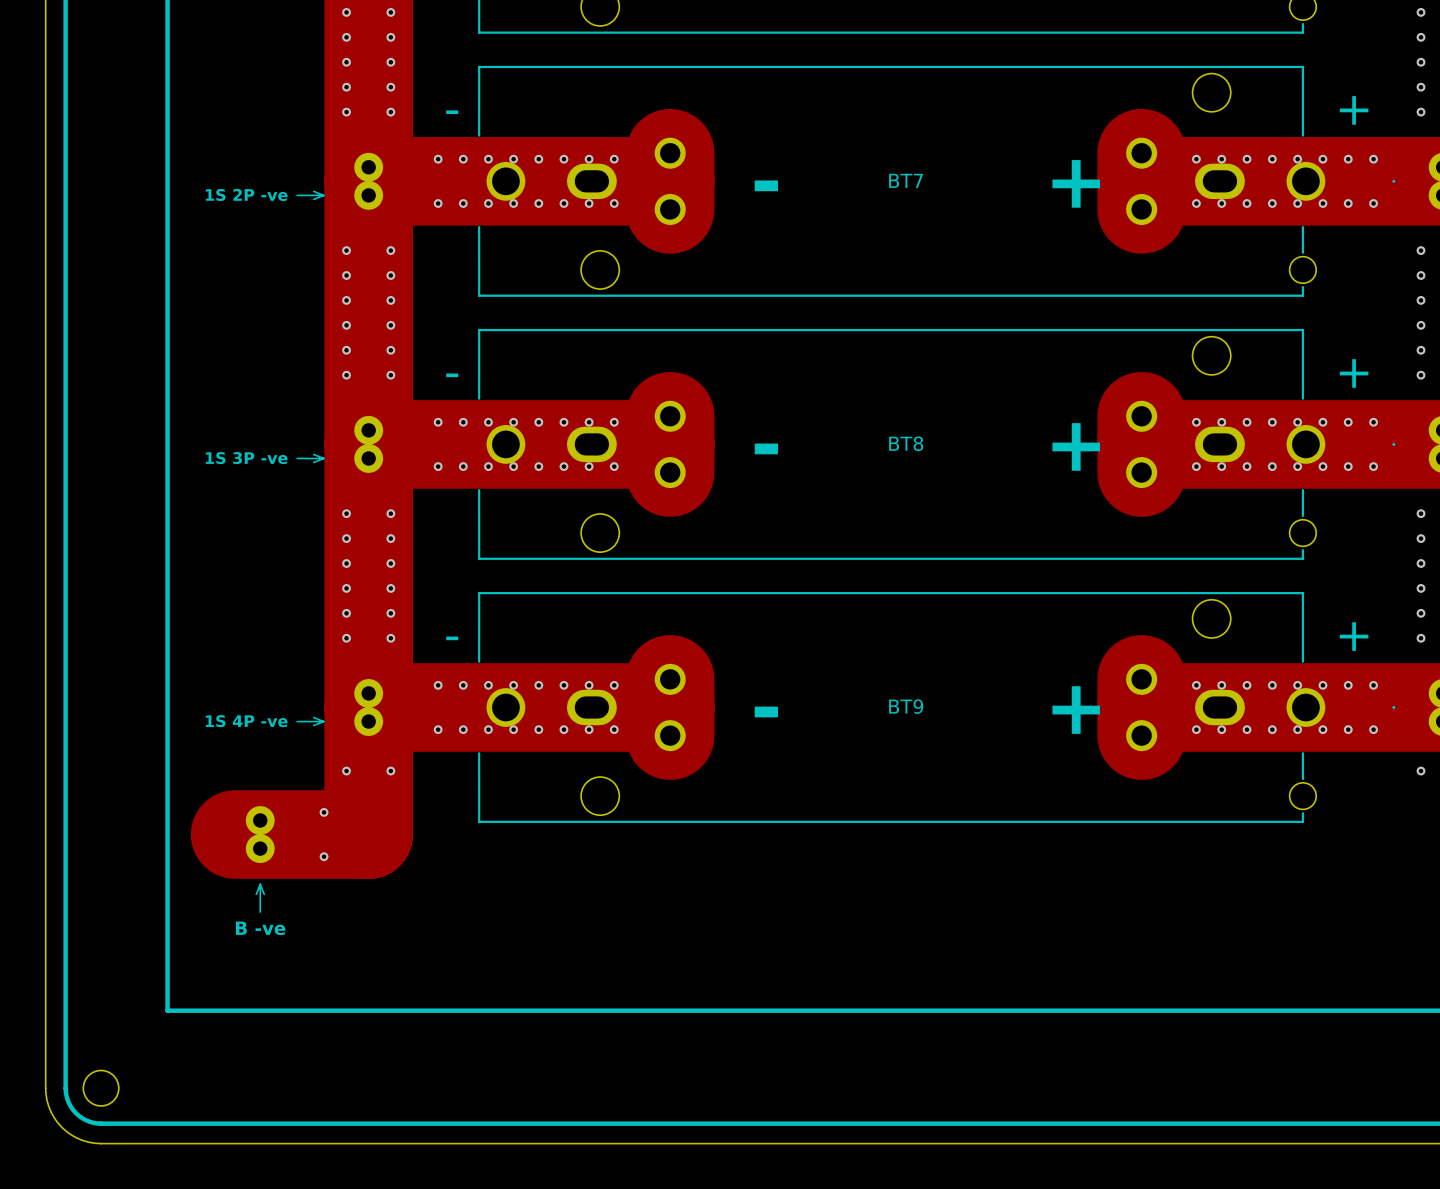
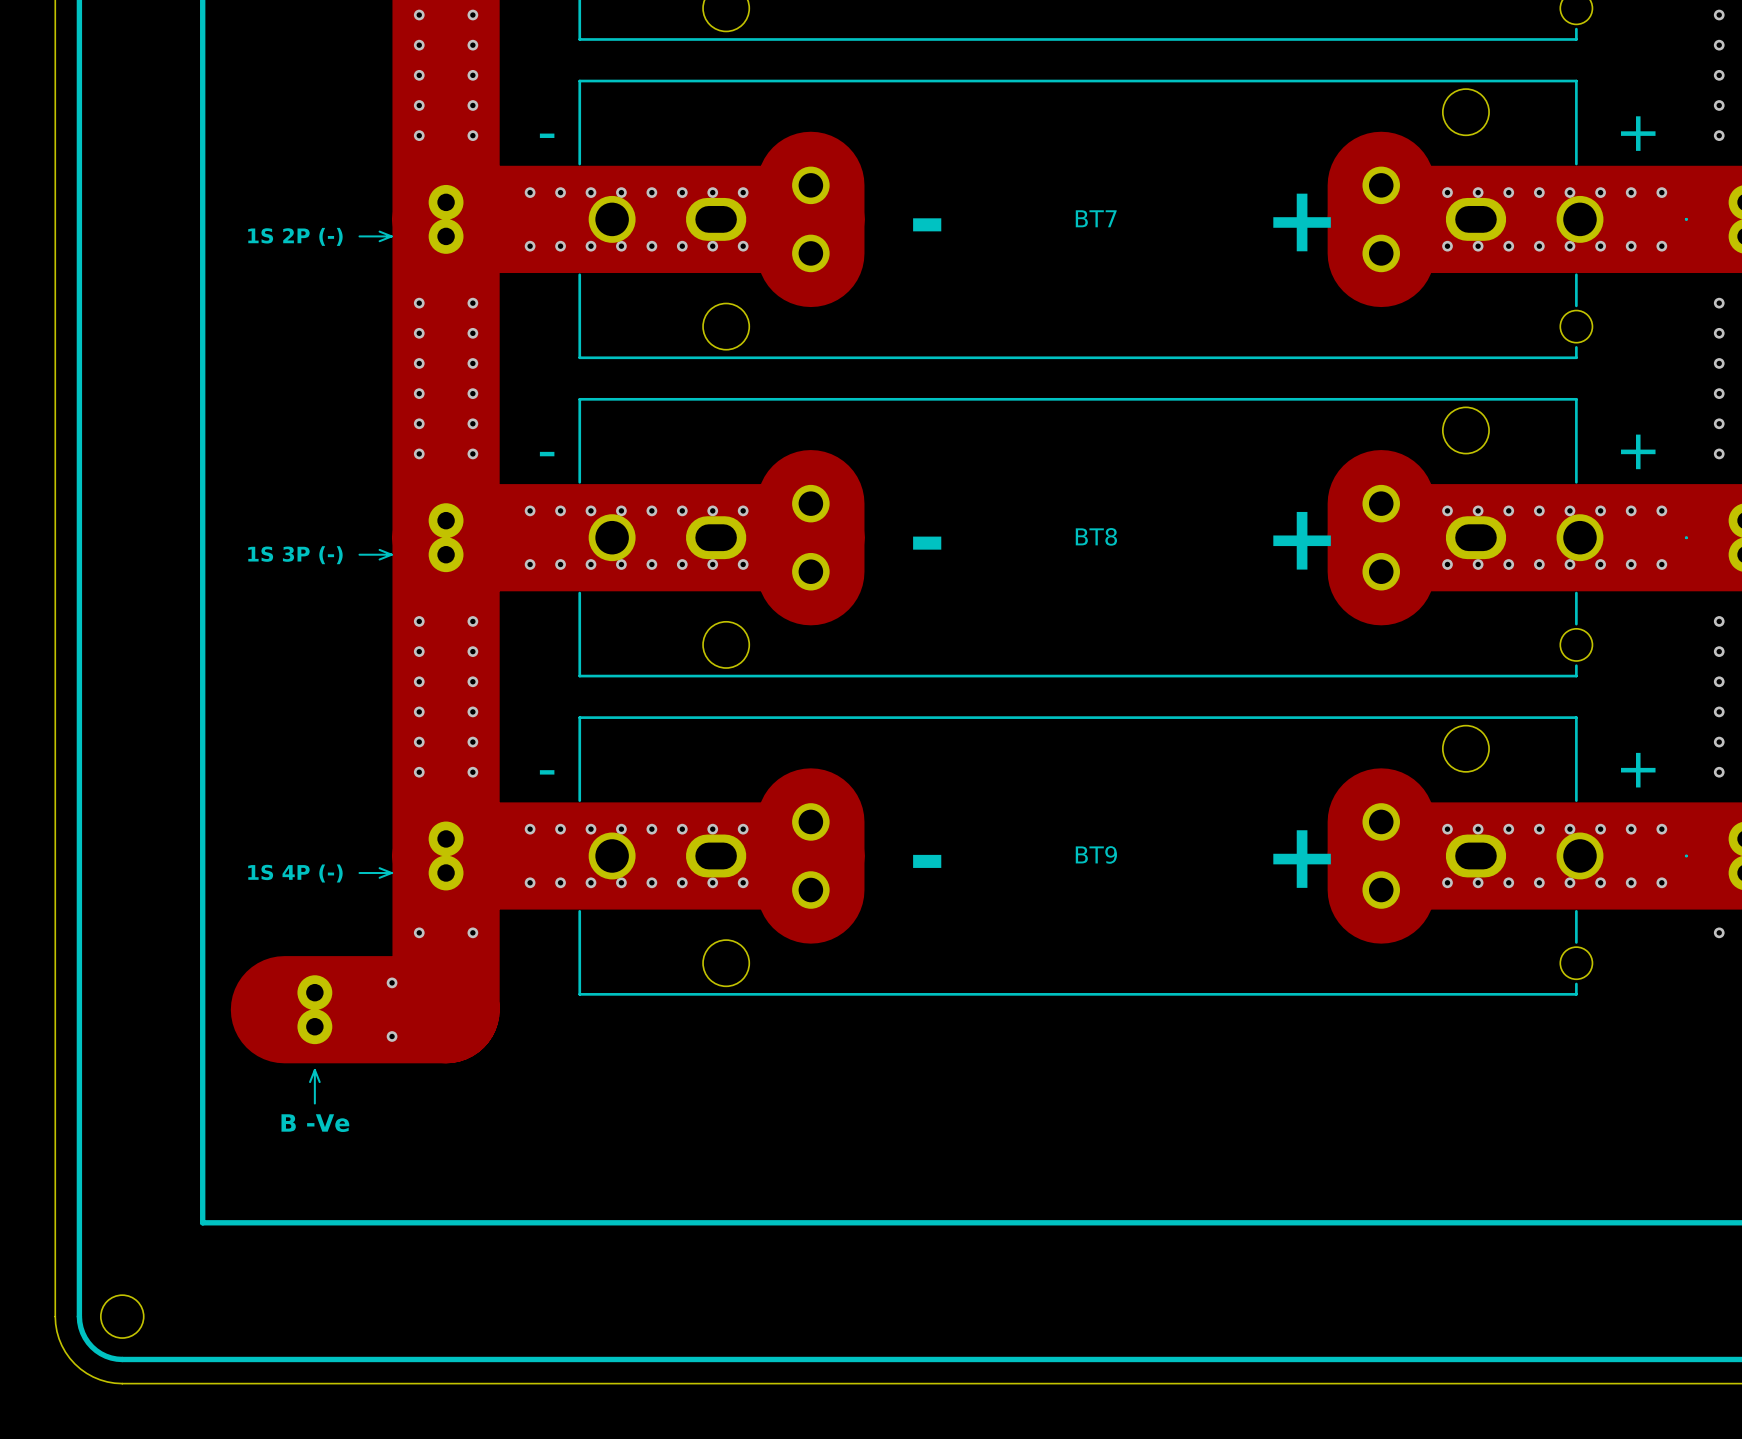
text: 1S 2P -ve (246, 194) -> 1S 2P (-) (295, 236)
text: 1S 3P -ve (246, 458) -> 1S 3P (-) (295, 555)
text: 1S 4P -ve (246, 721) -> 1S 4P (-) (295, 873)
text: B -ve (260, 928) -> B -Ve (315, 1123)

